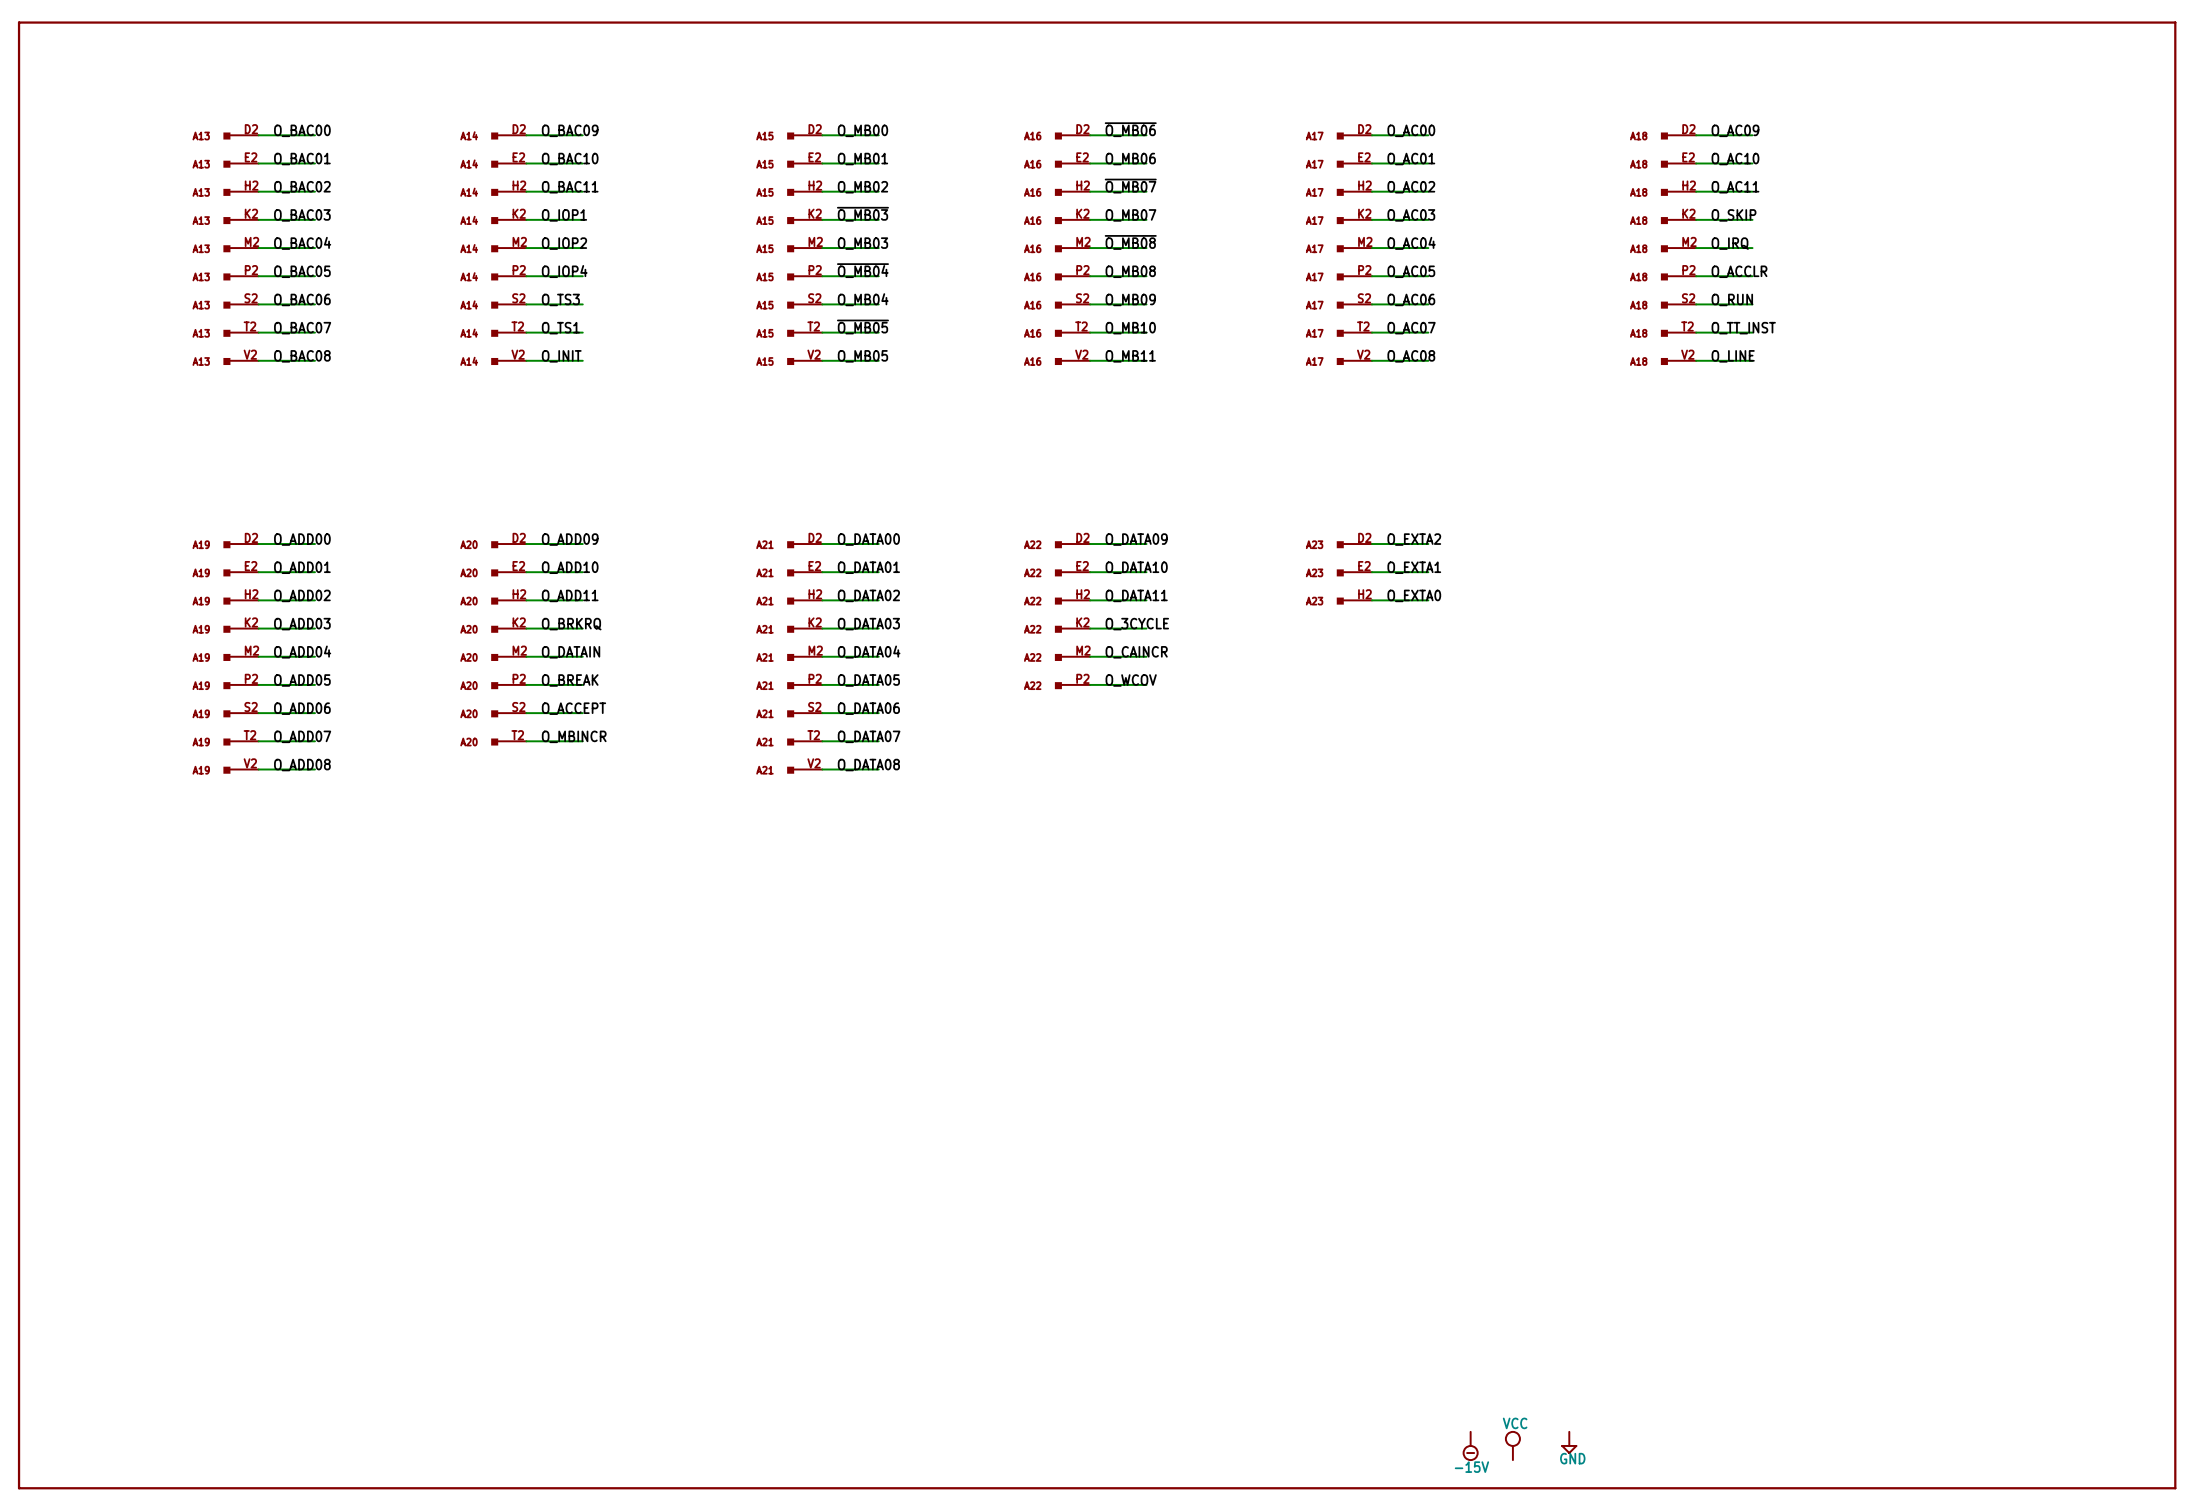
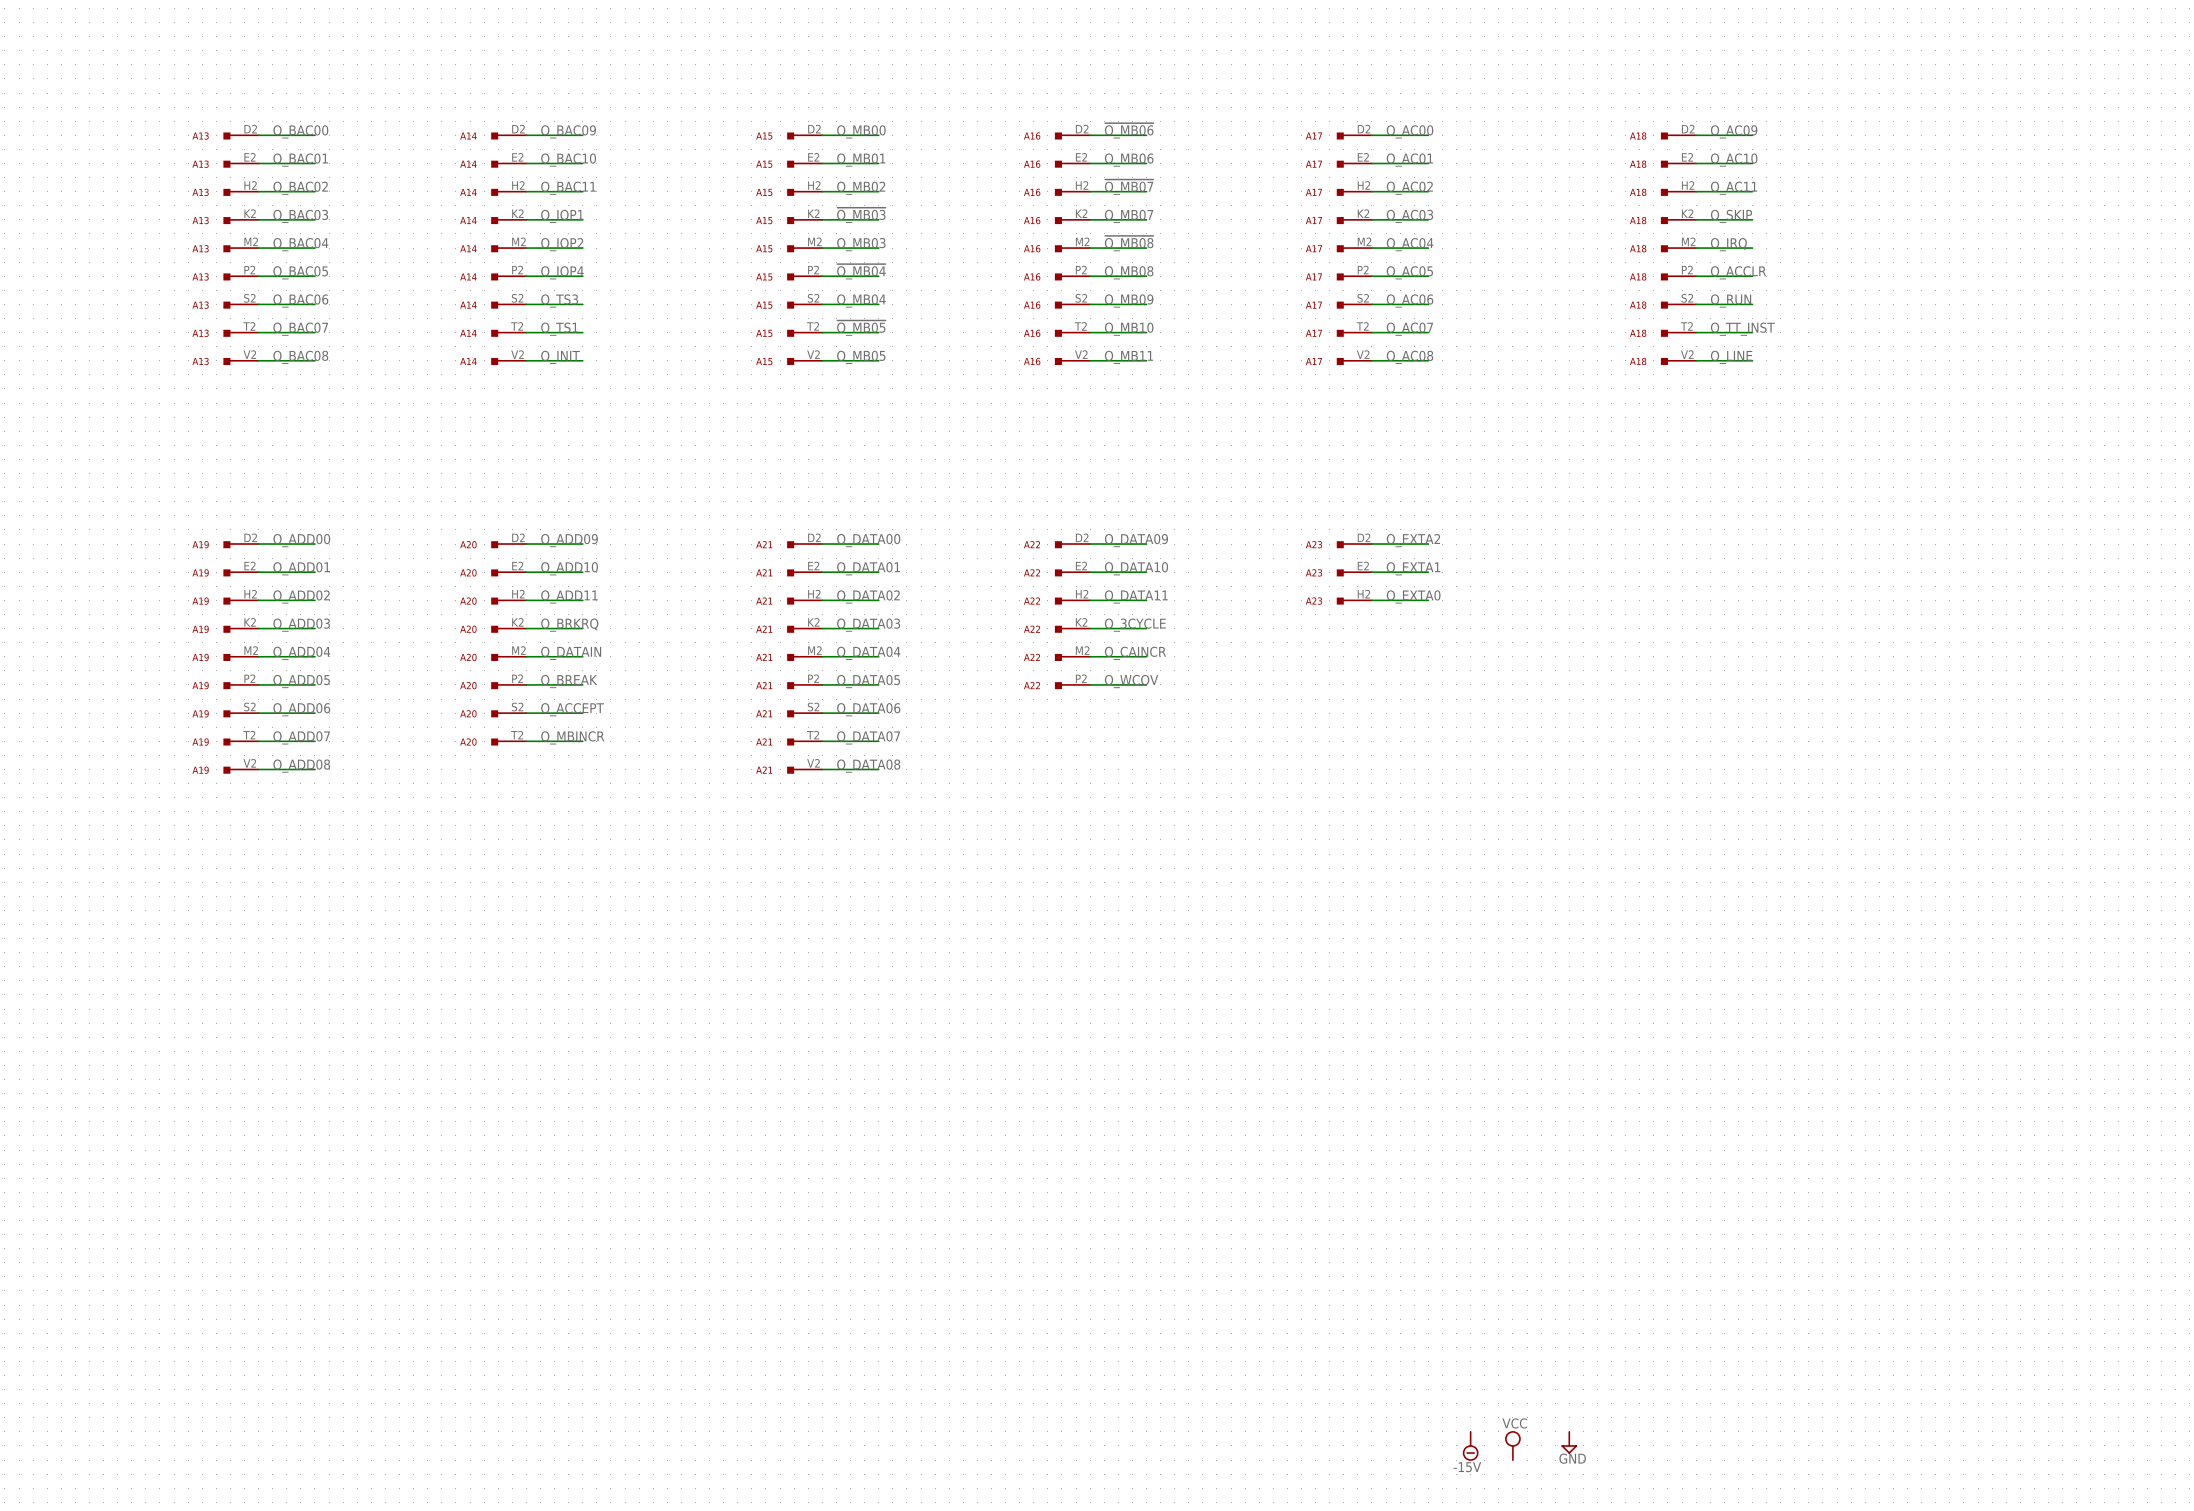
part: (1097, 755) -> none

